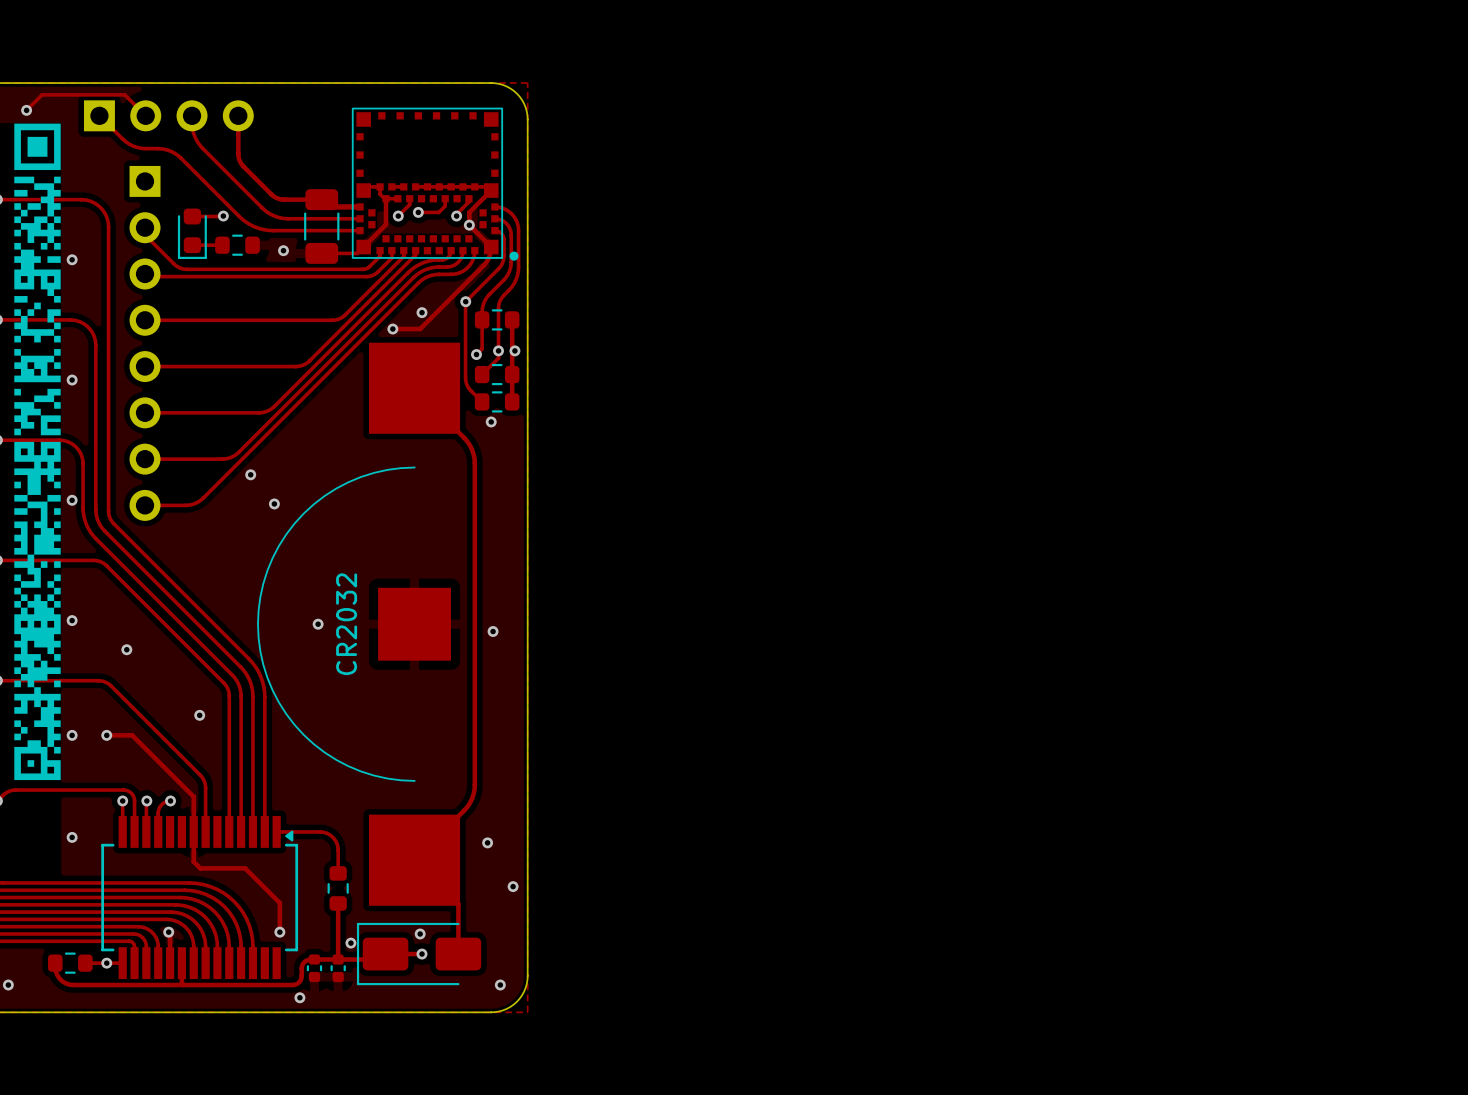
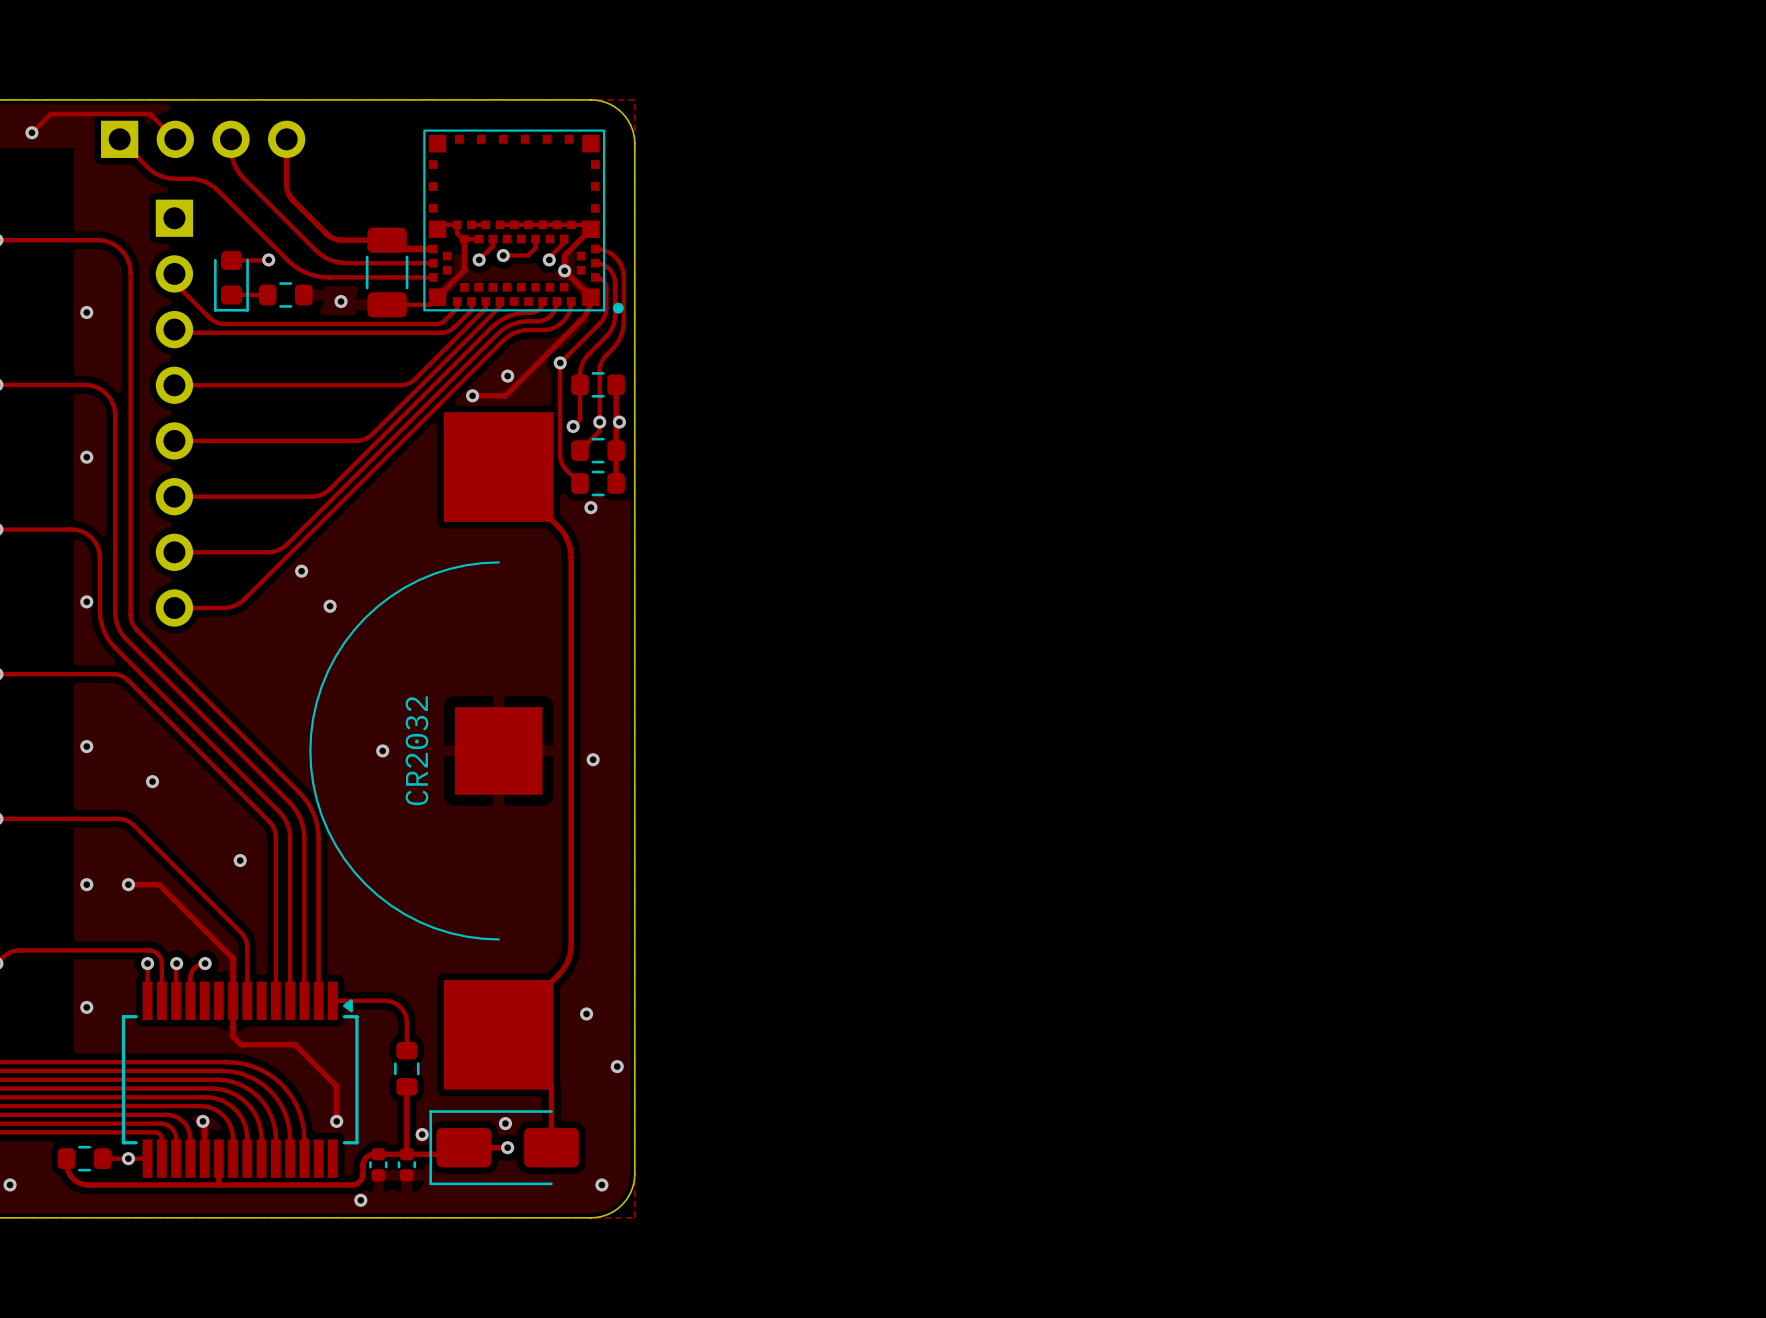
drawing: [14, 123, 61, 781] -> none

